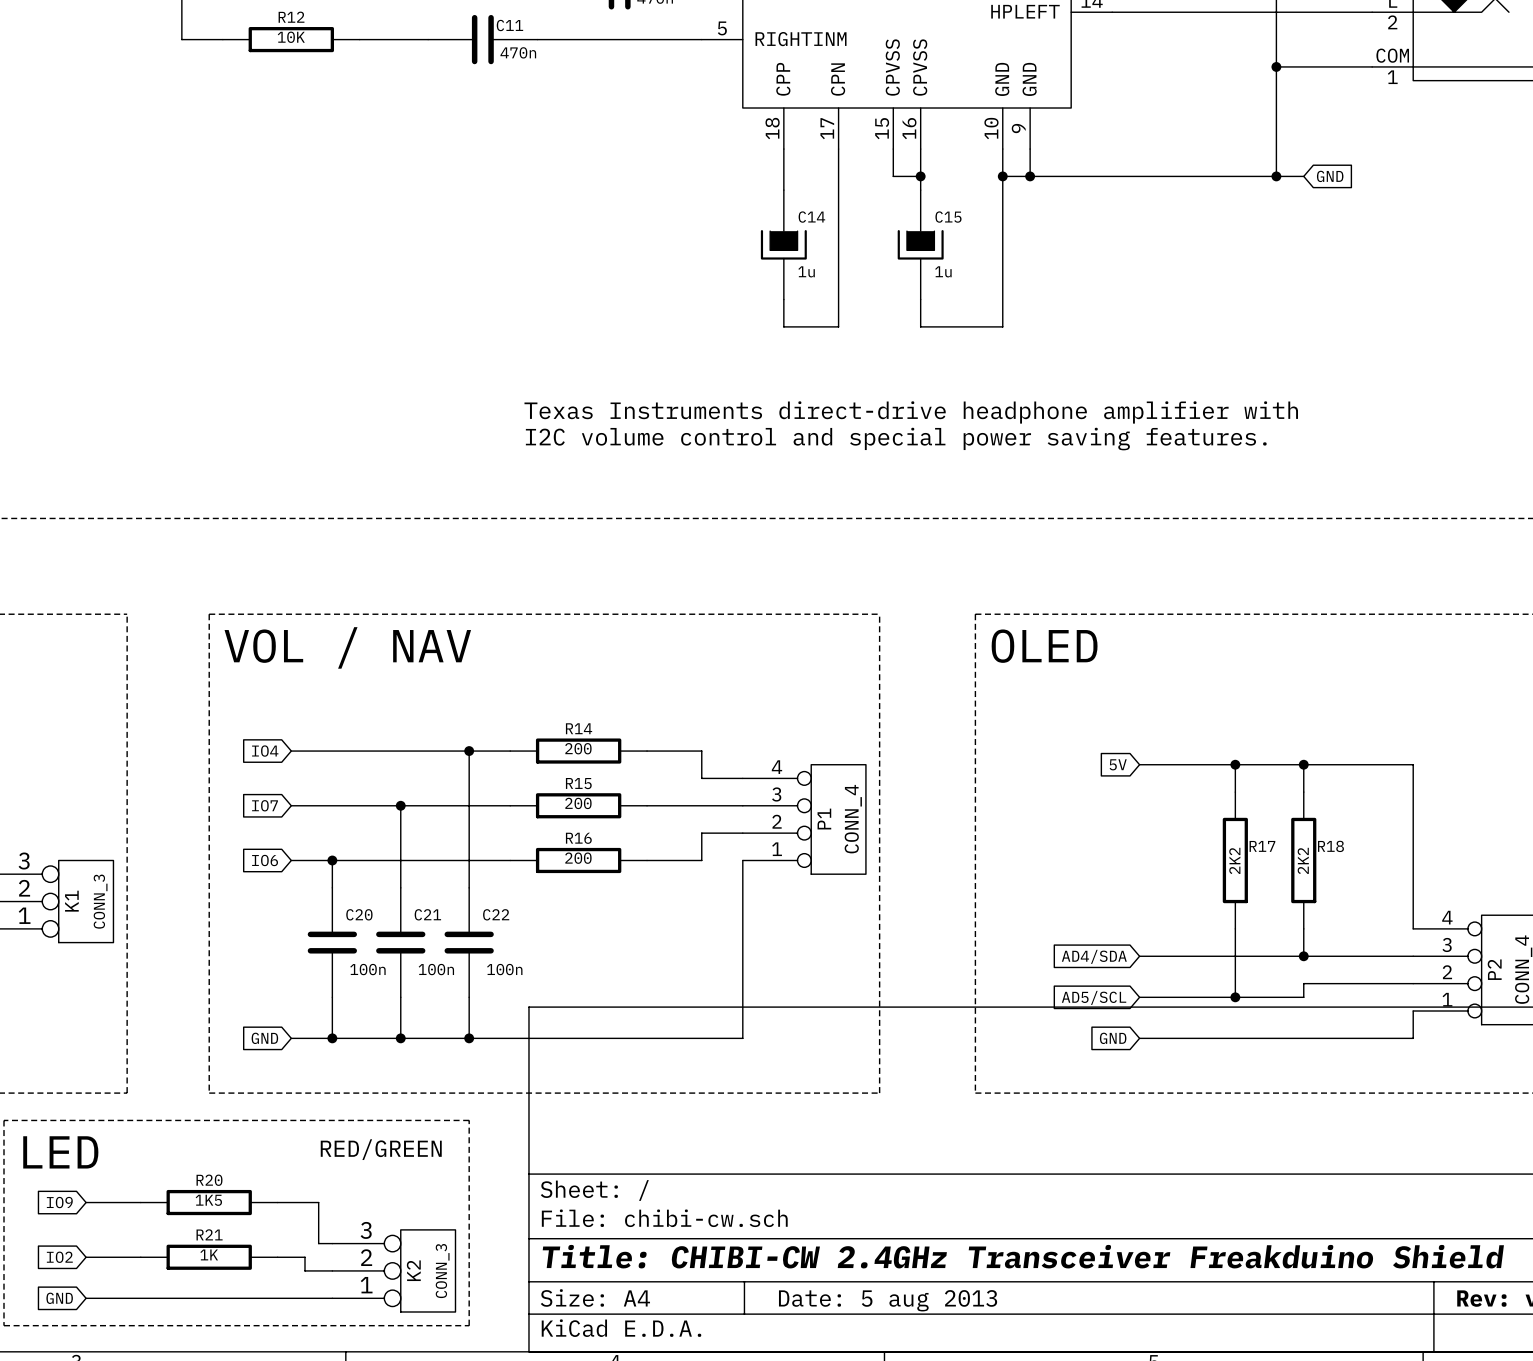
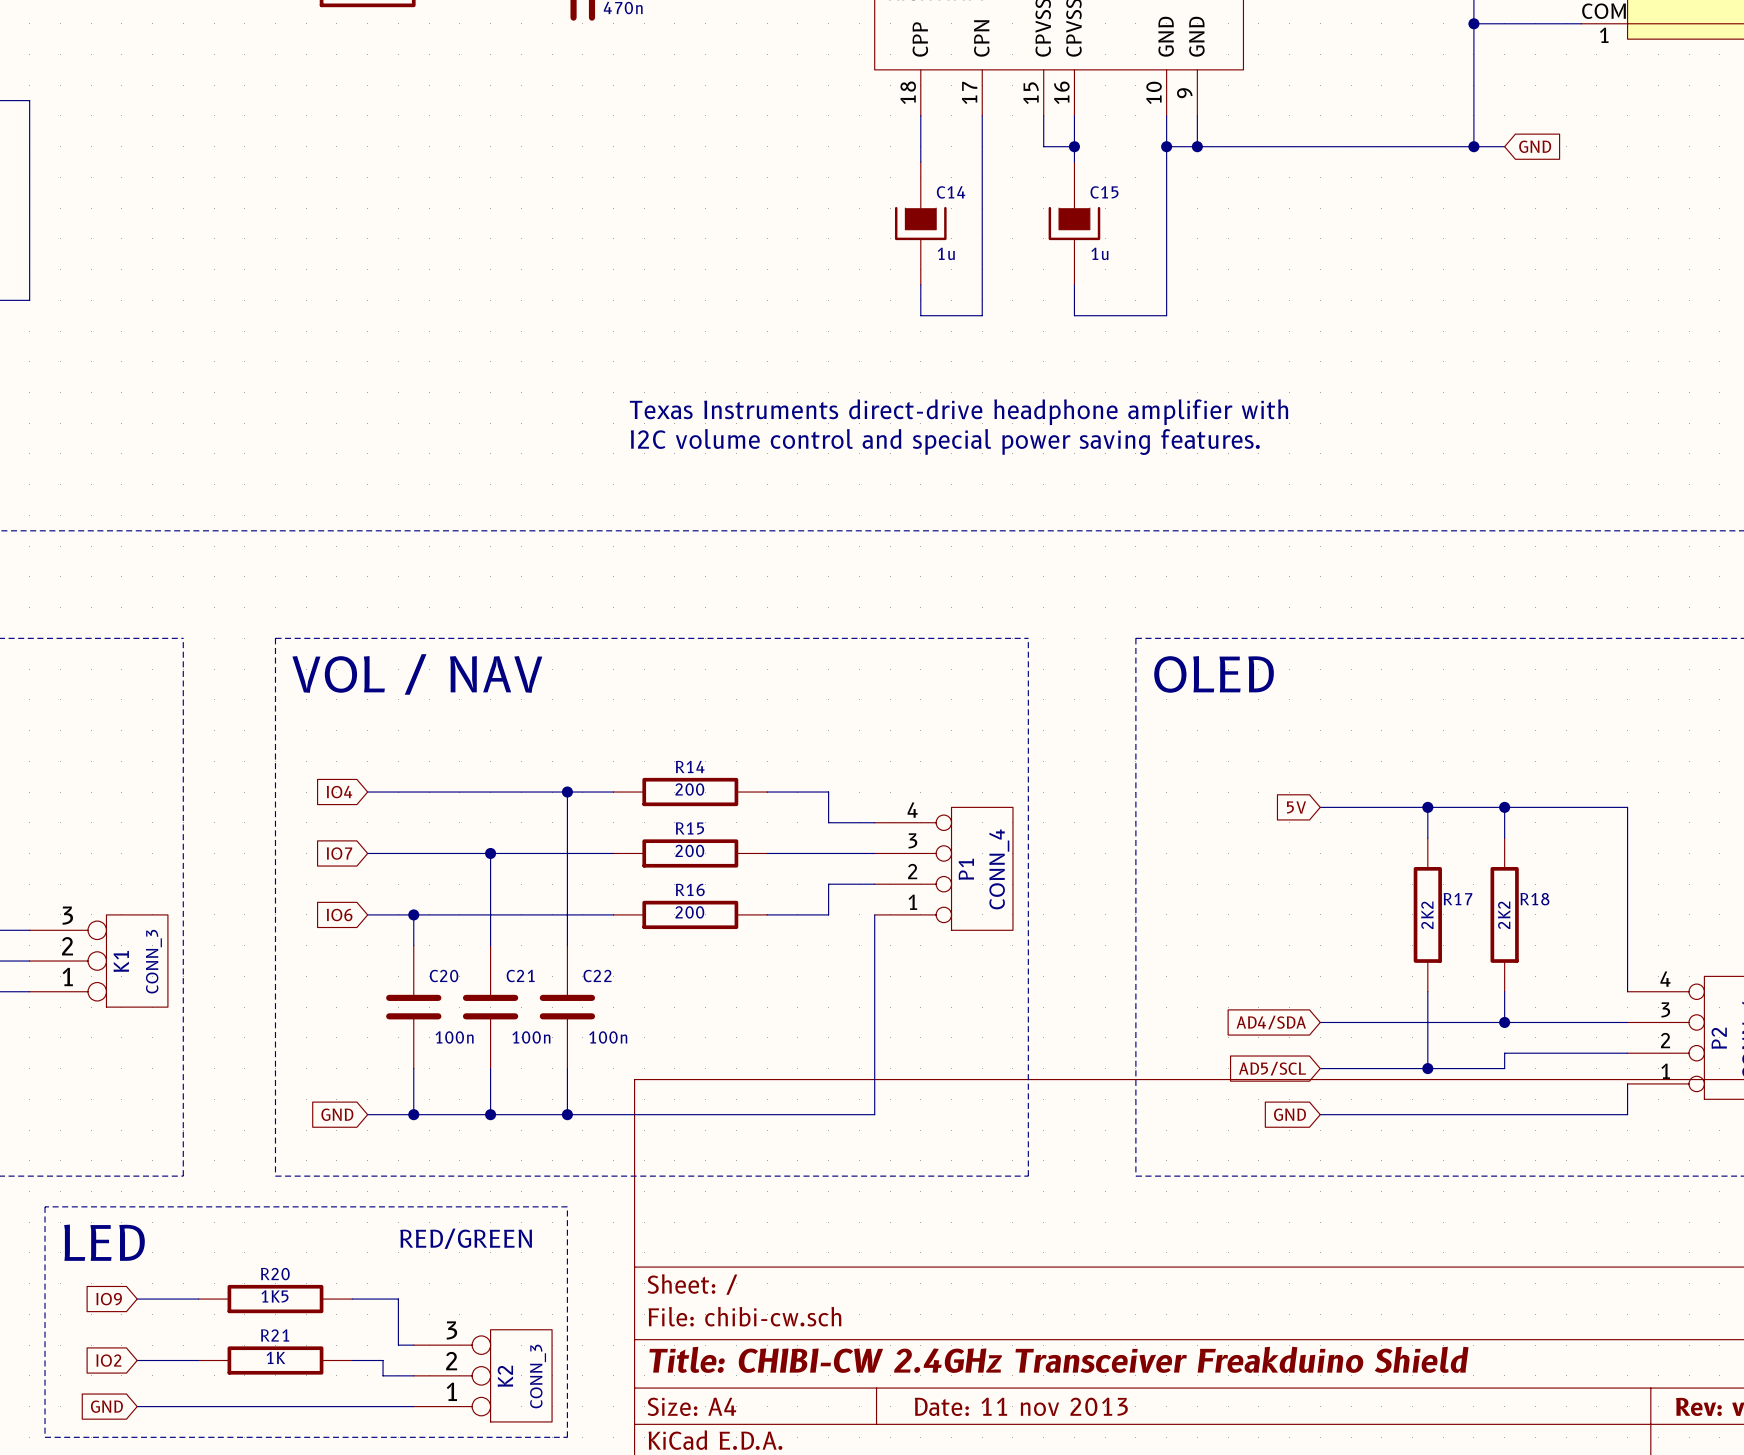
title block: Date: 5 aug 2013 (888, 1300) -> Date: 11 nov 2013 (1021, 1406)

